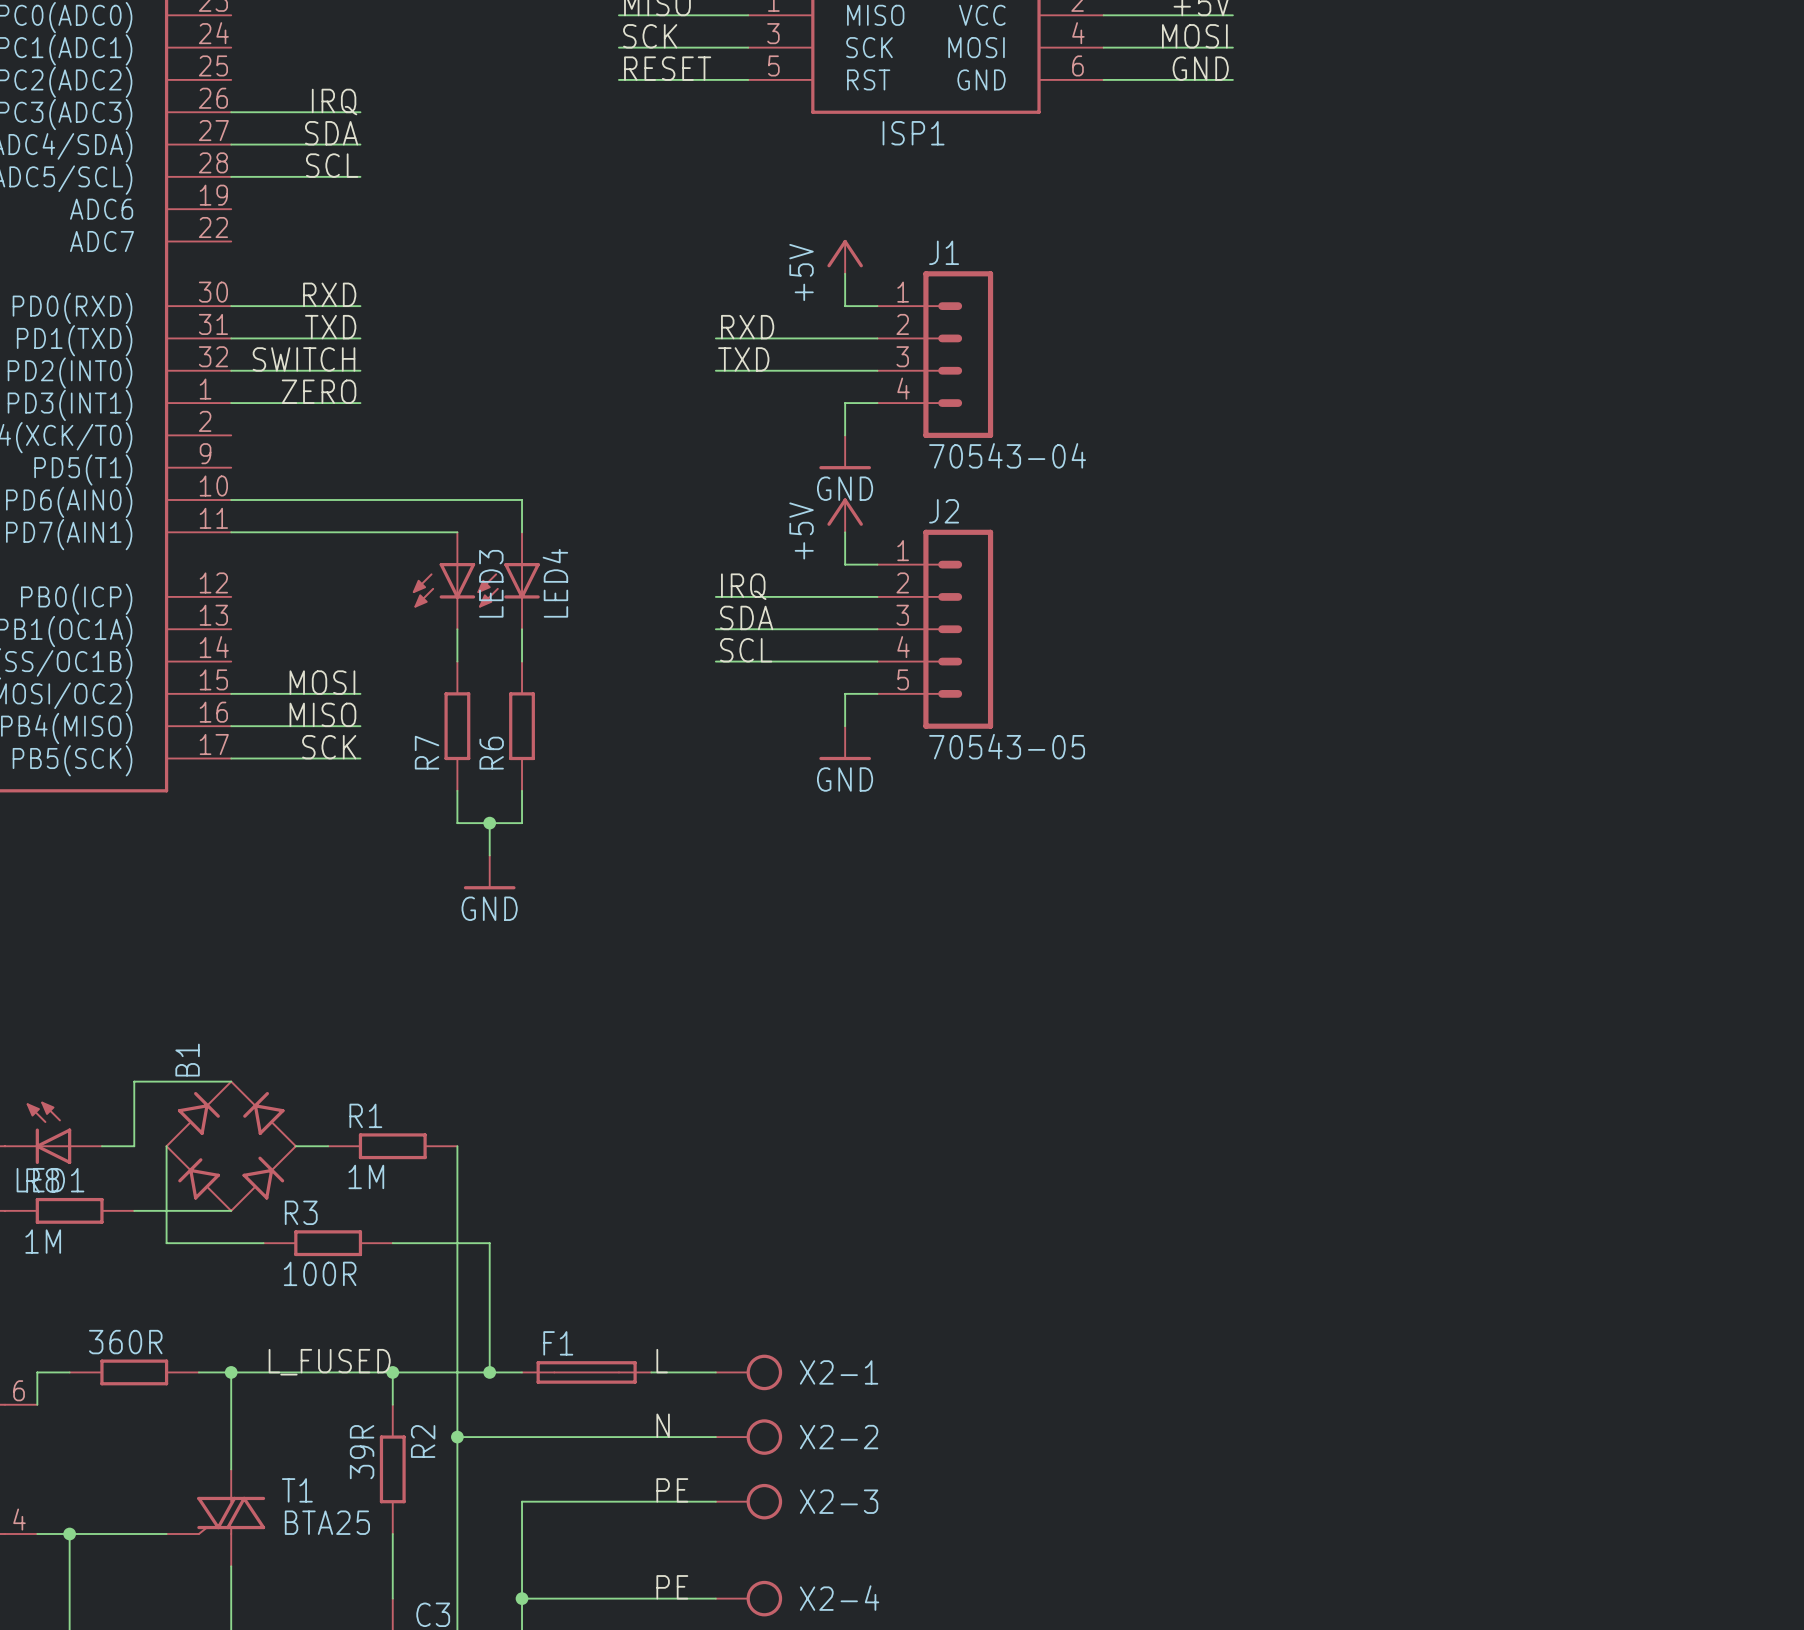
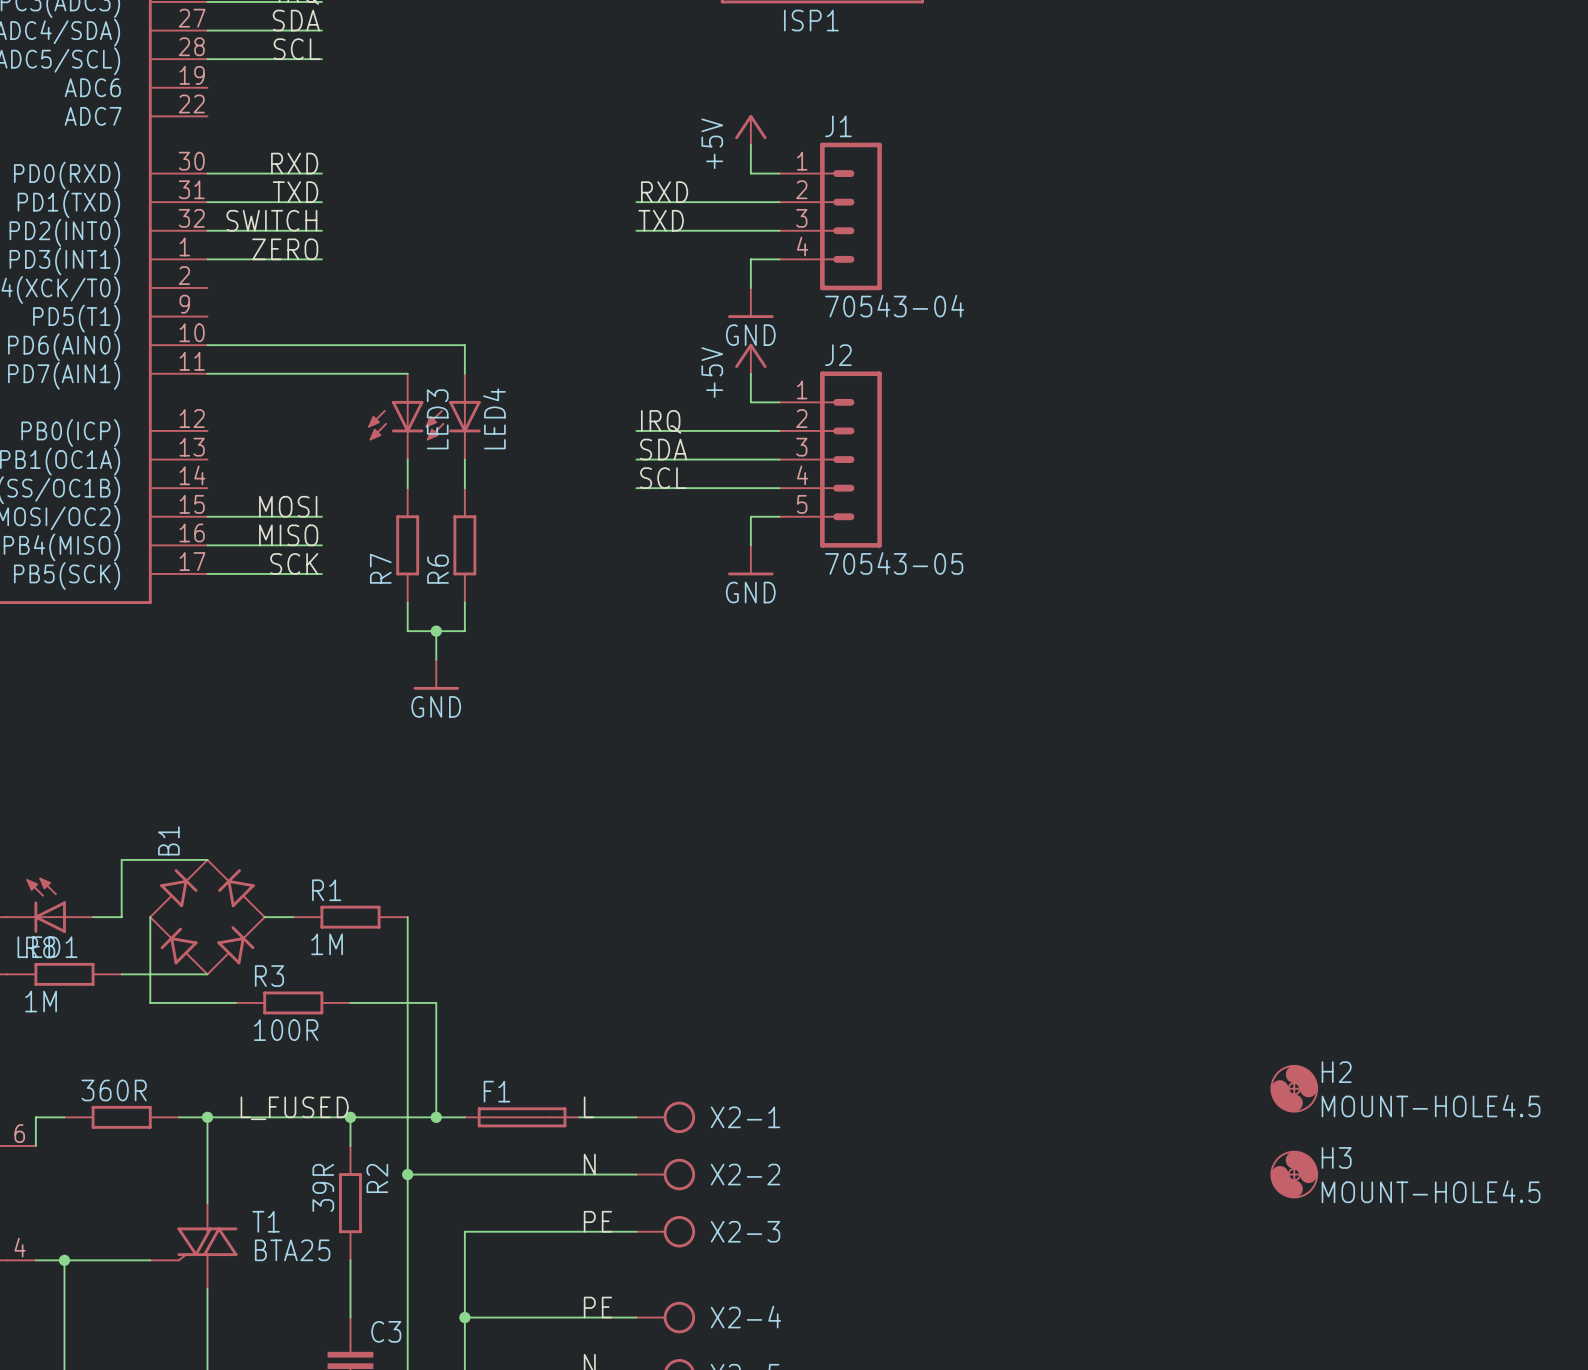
H2: none -> MOUNT-HOLE4.5 (1294, 1088)
H3: none -> MOUNT-HOLE4.5 (1294, 1174)

